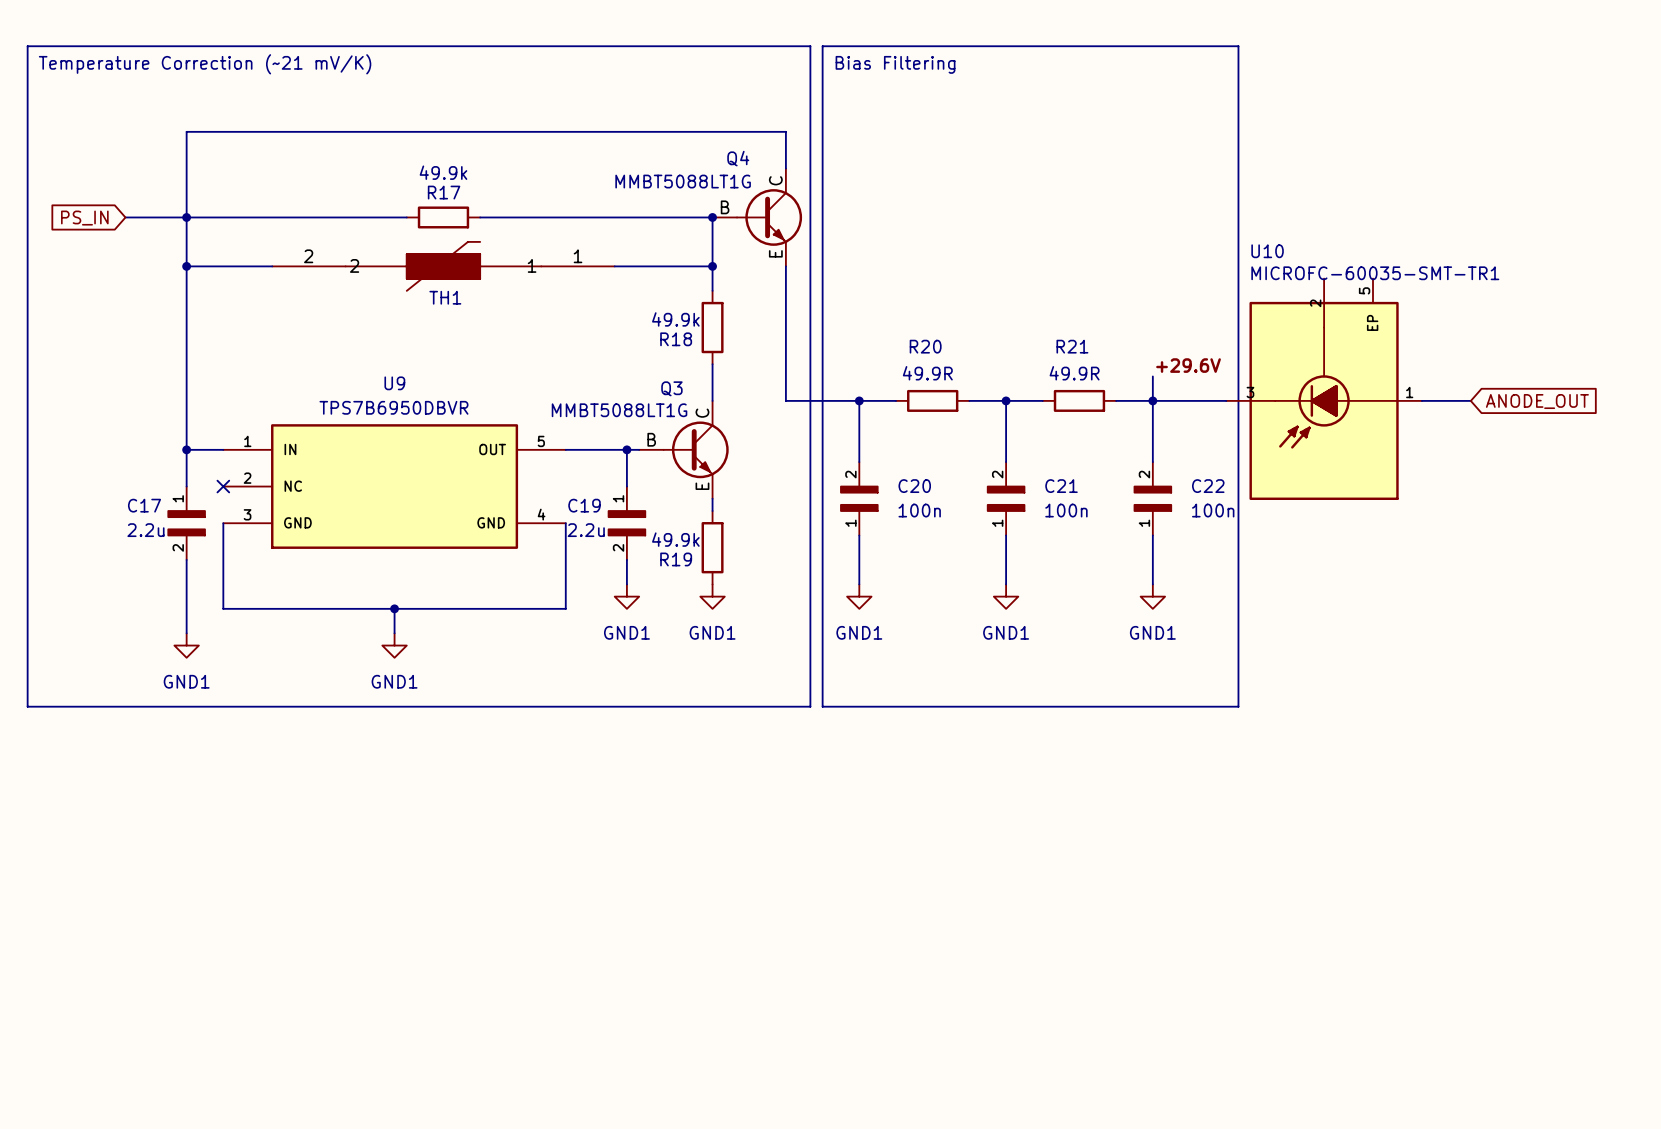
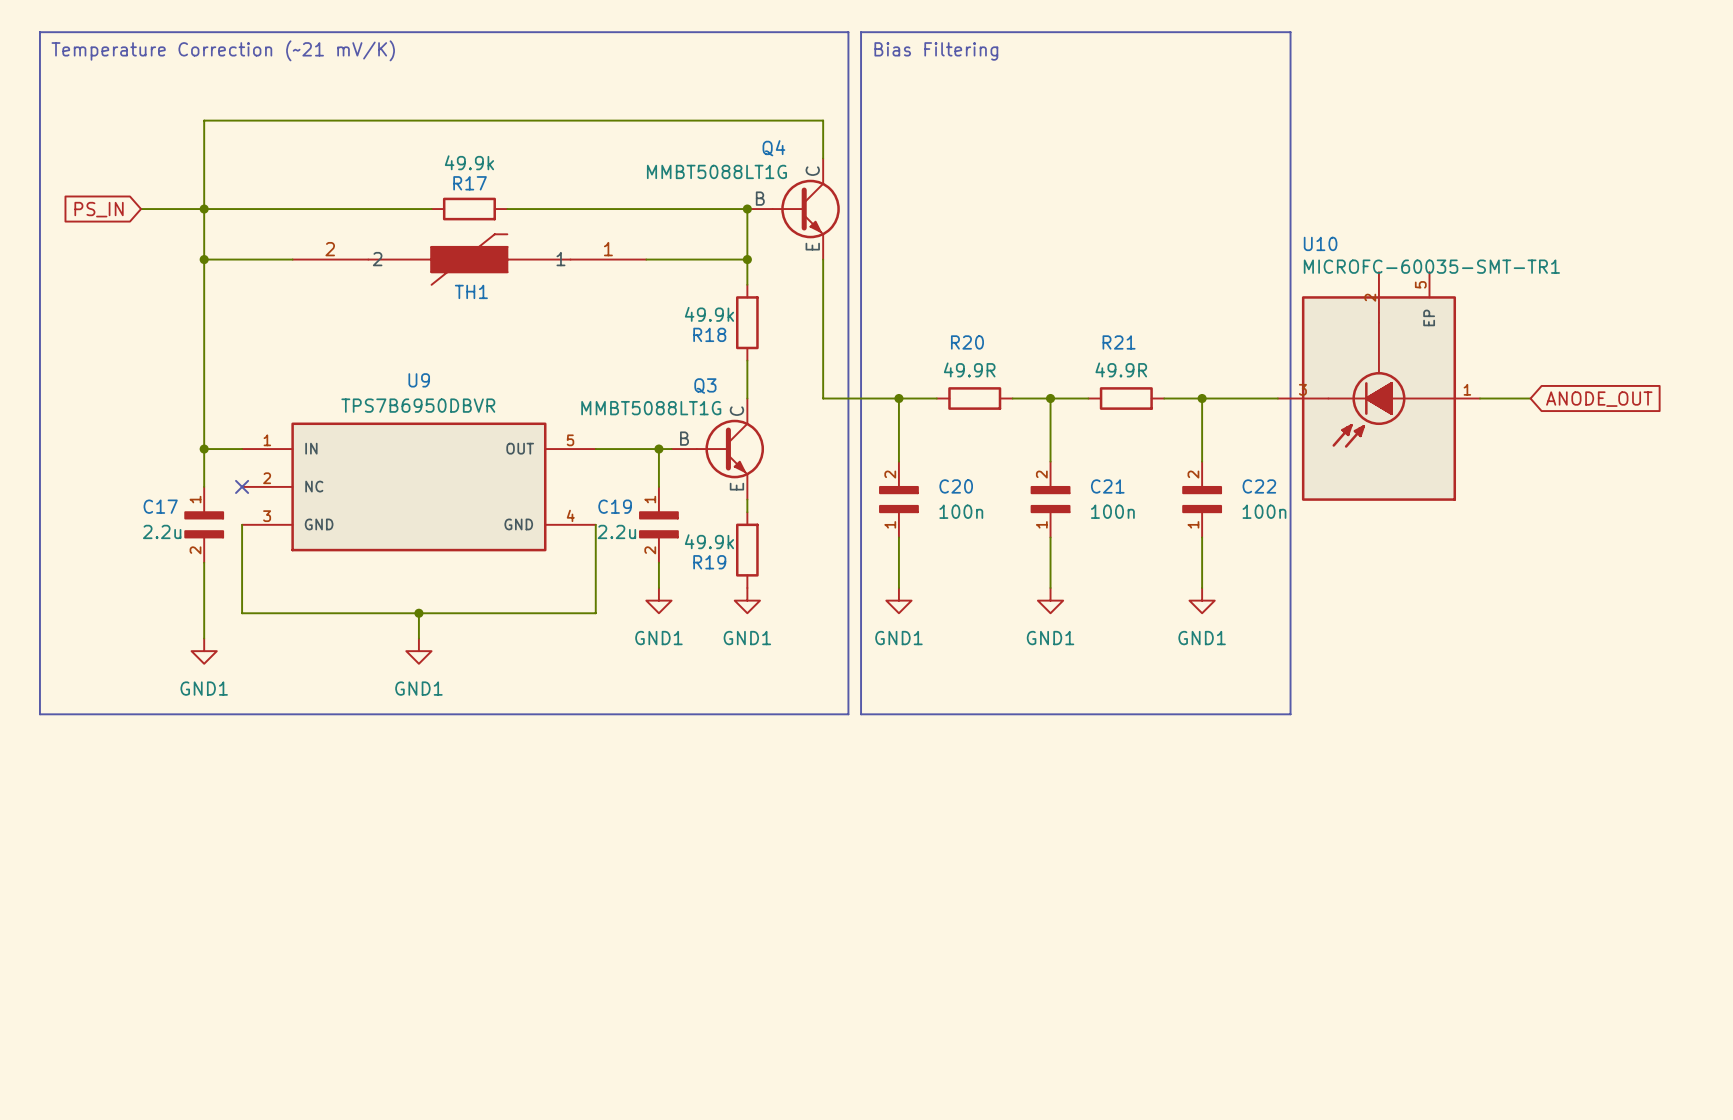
label: +29.6V (1188, 365) -> none
wire: (1152, 376) (1152, 400) -> none

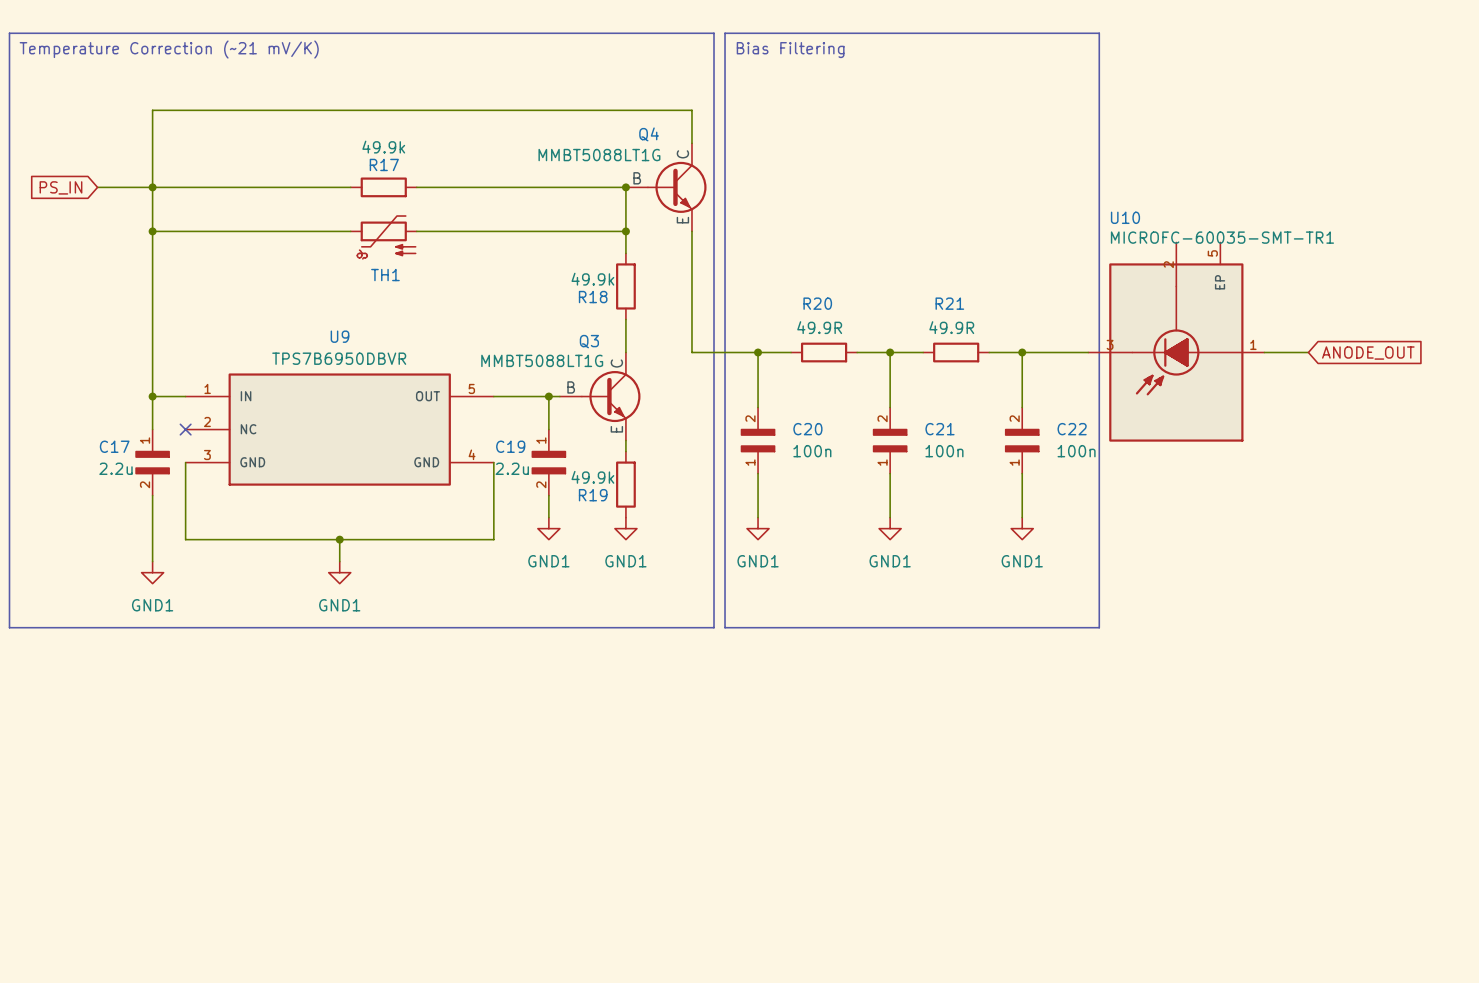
TH1 symbol: [292, 233, 647, 286] -> [350, 216, 417, 259]

